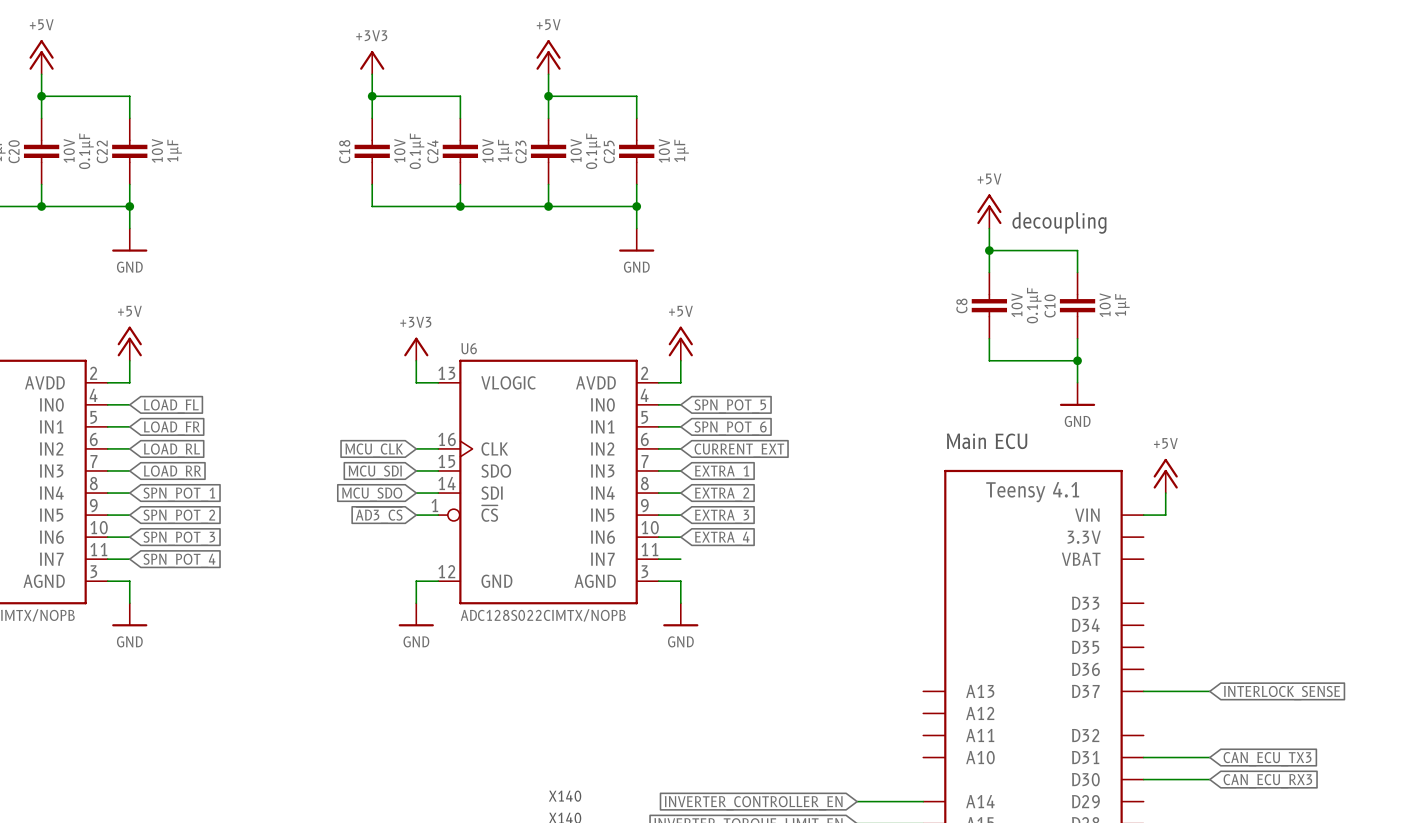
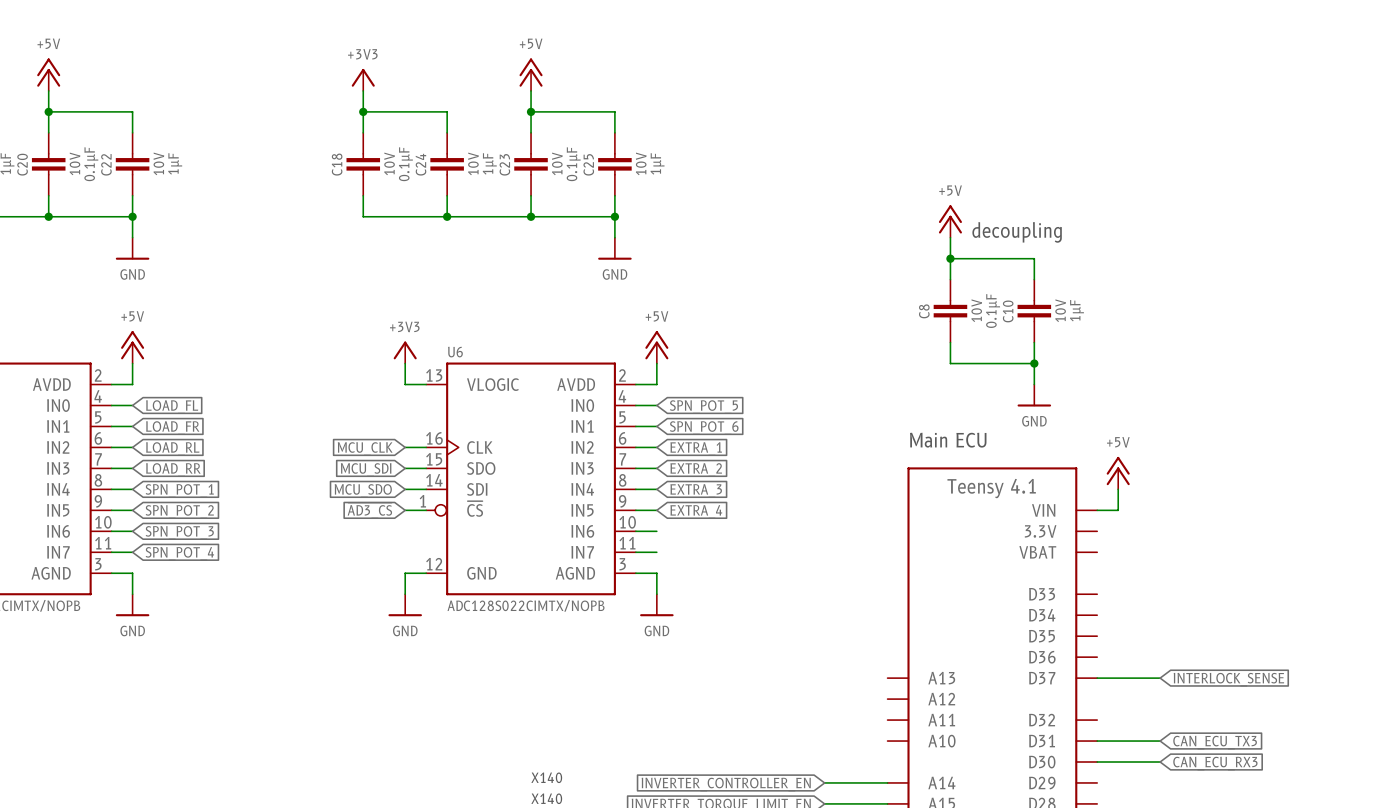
global label: CURRENT_EXT (739, 450) -> EXTRA_1 (696, 449)
global label: EXTRA_1 (722, 472) -> EXTRA_2 (696, 469)
global label: EXTRA_2 (722, 494) -> EXTRA_3 (696, 490)
global label: EXTRA_3 (722, 516) -> EXTRA_4 (696, 511)
global label: EXTRA_4 (722, 538) -> none

